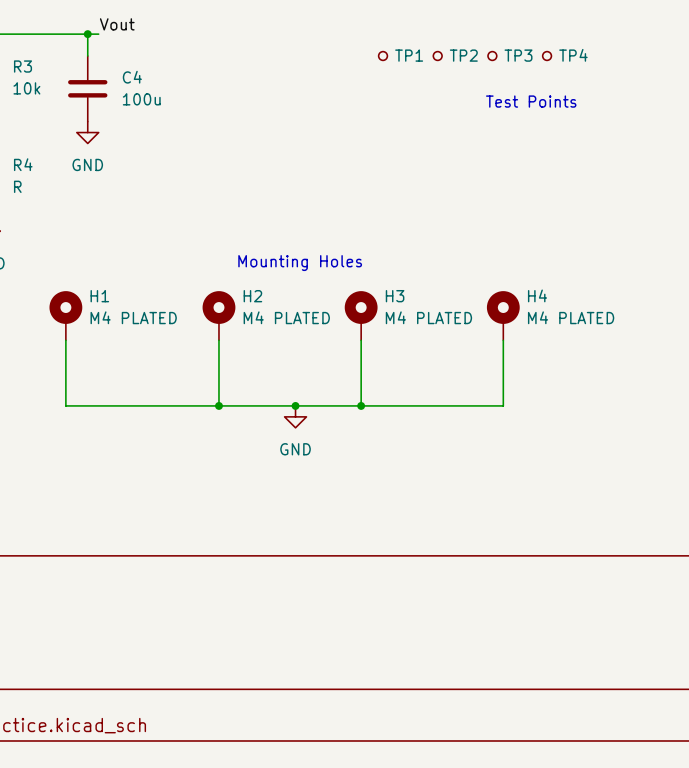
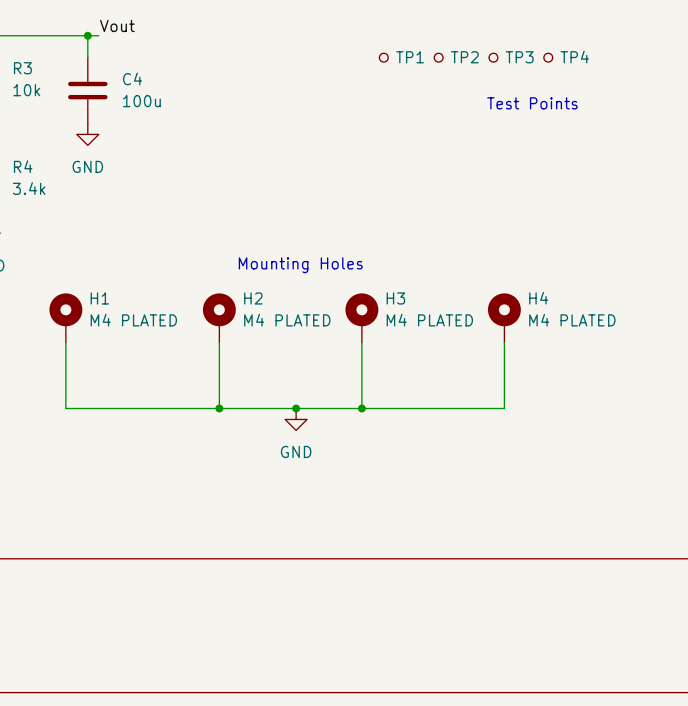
R4 value: R (17, 186) -> 3.4k (29, 188)

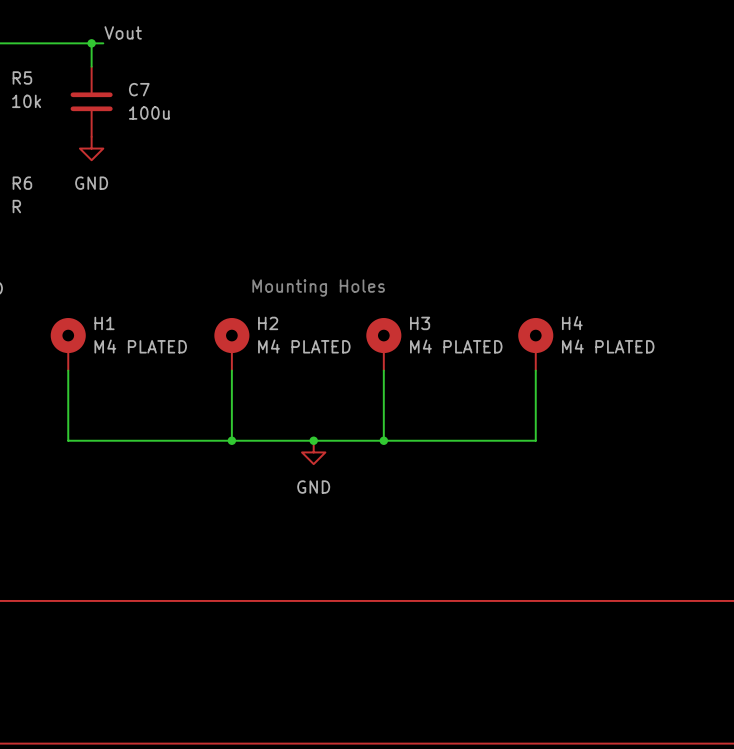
TP1: (383, 57) -> none
TP2: (438, 57) -> none
TP3: (493, 57) -> none
TP4: (548, 57) -> none
R3 name: R3 (22, 68) -> R5 (22, 77)
C4 name: C4 (132, 78) -> C7 (139, 89)
text: Test Points (532, 103) -> none
R4 name: R4 (23, 166) -> R6 (22, 183)
R4 value: 3.4k (29, 188) -> R (16, 206)

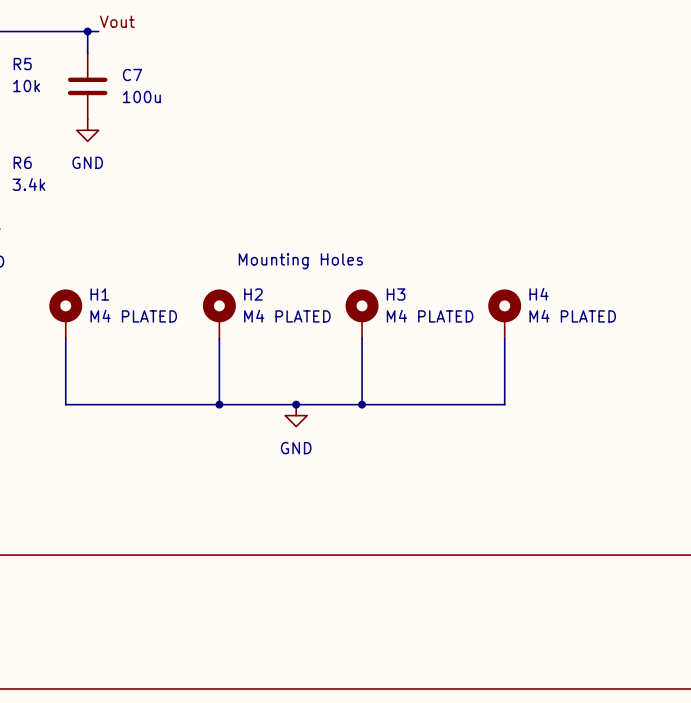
R6 value: R (16, 206) -> 3.4k (28, 184)

